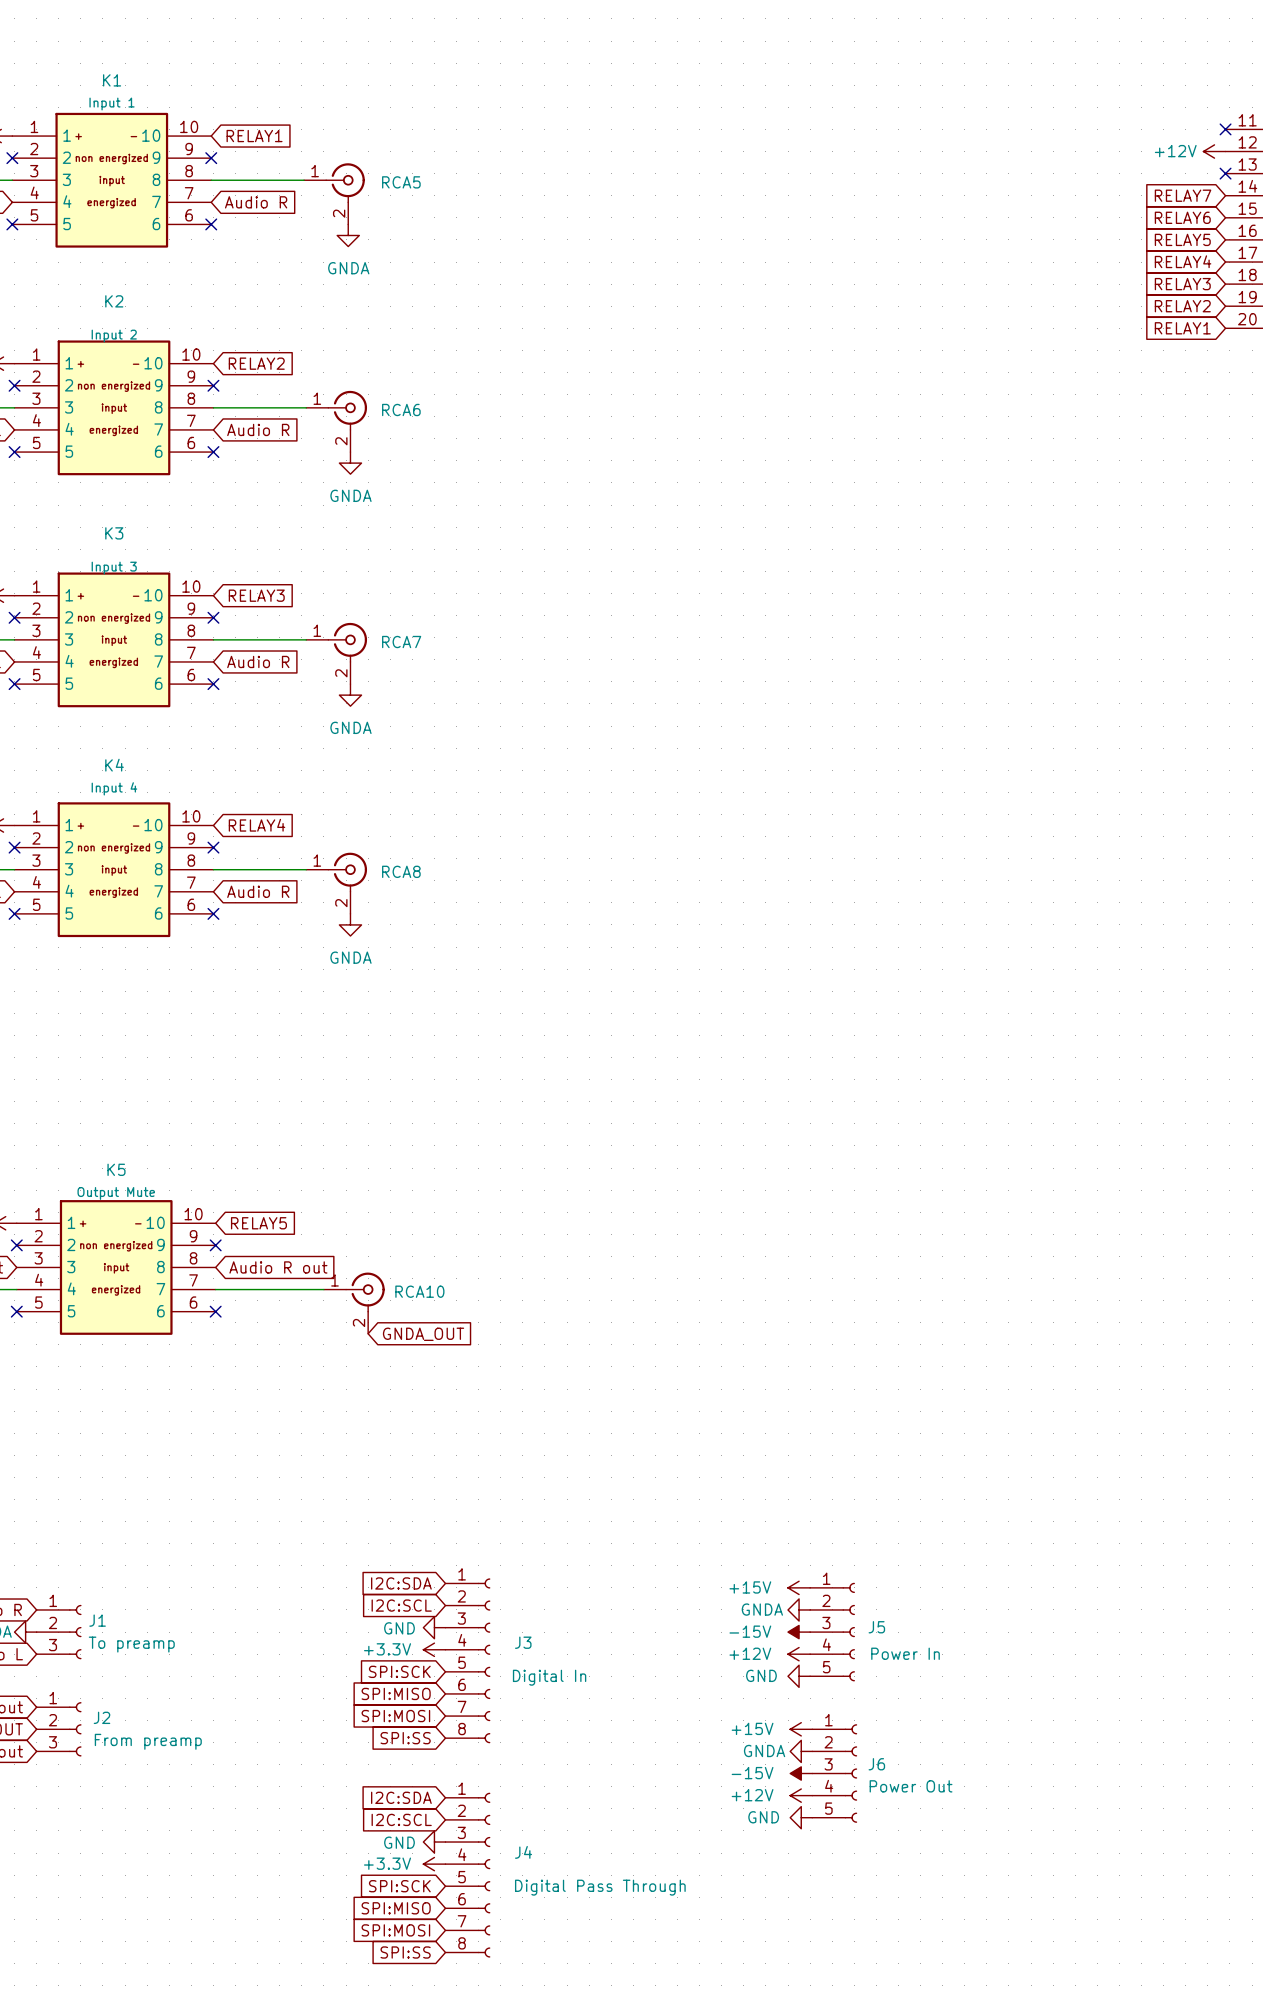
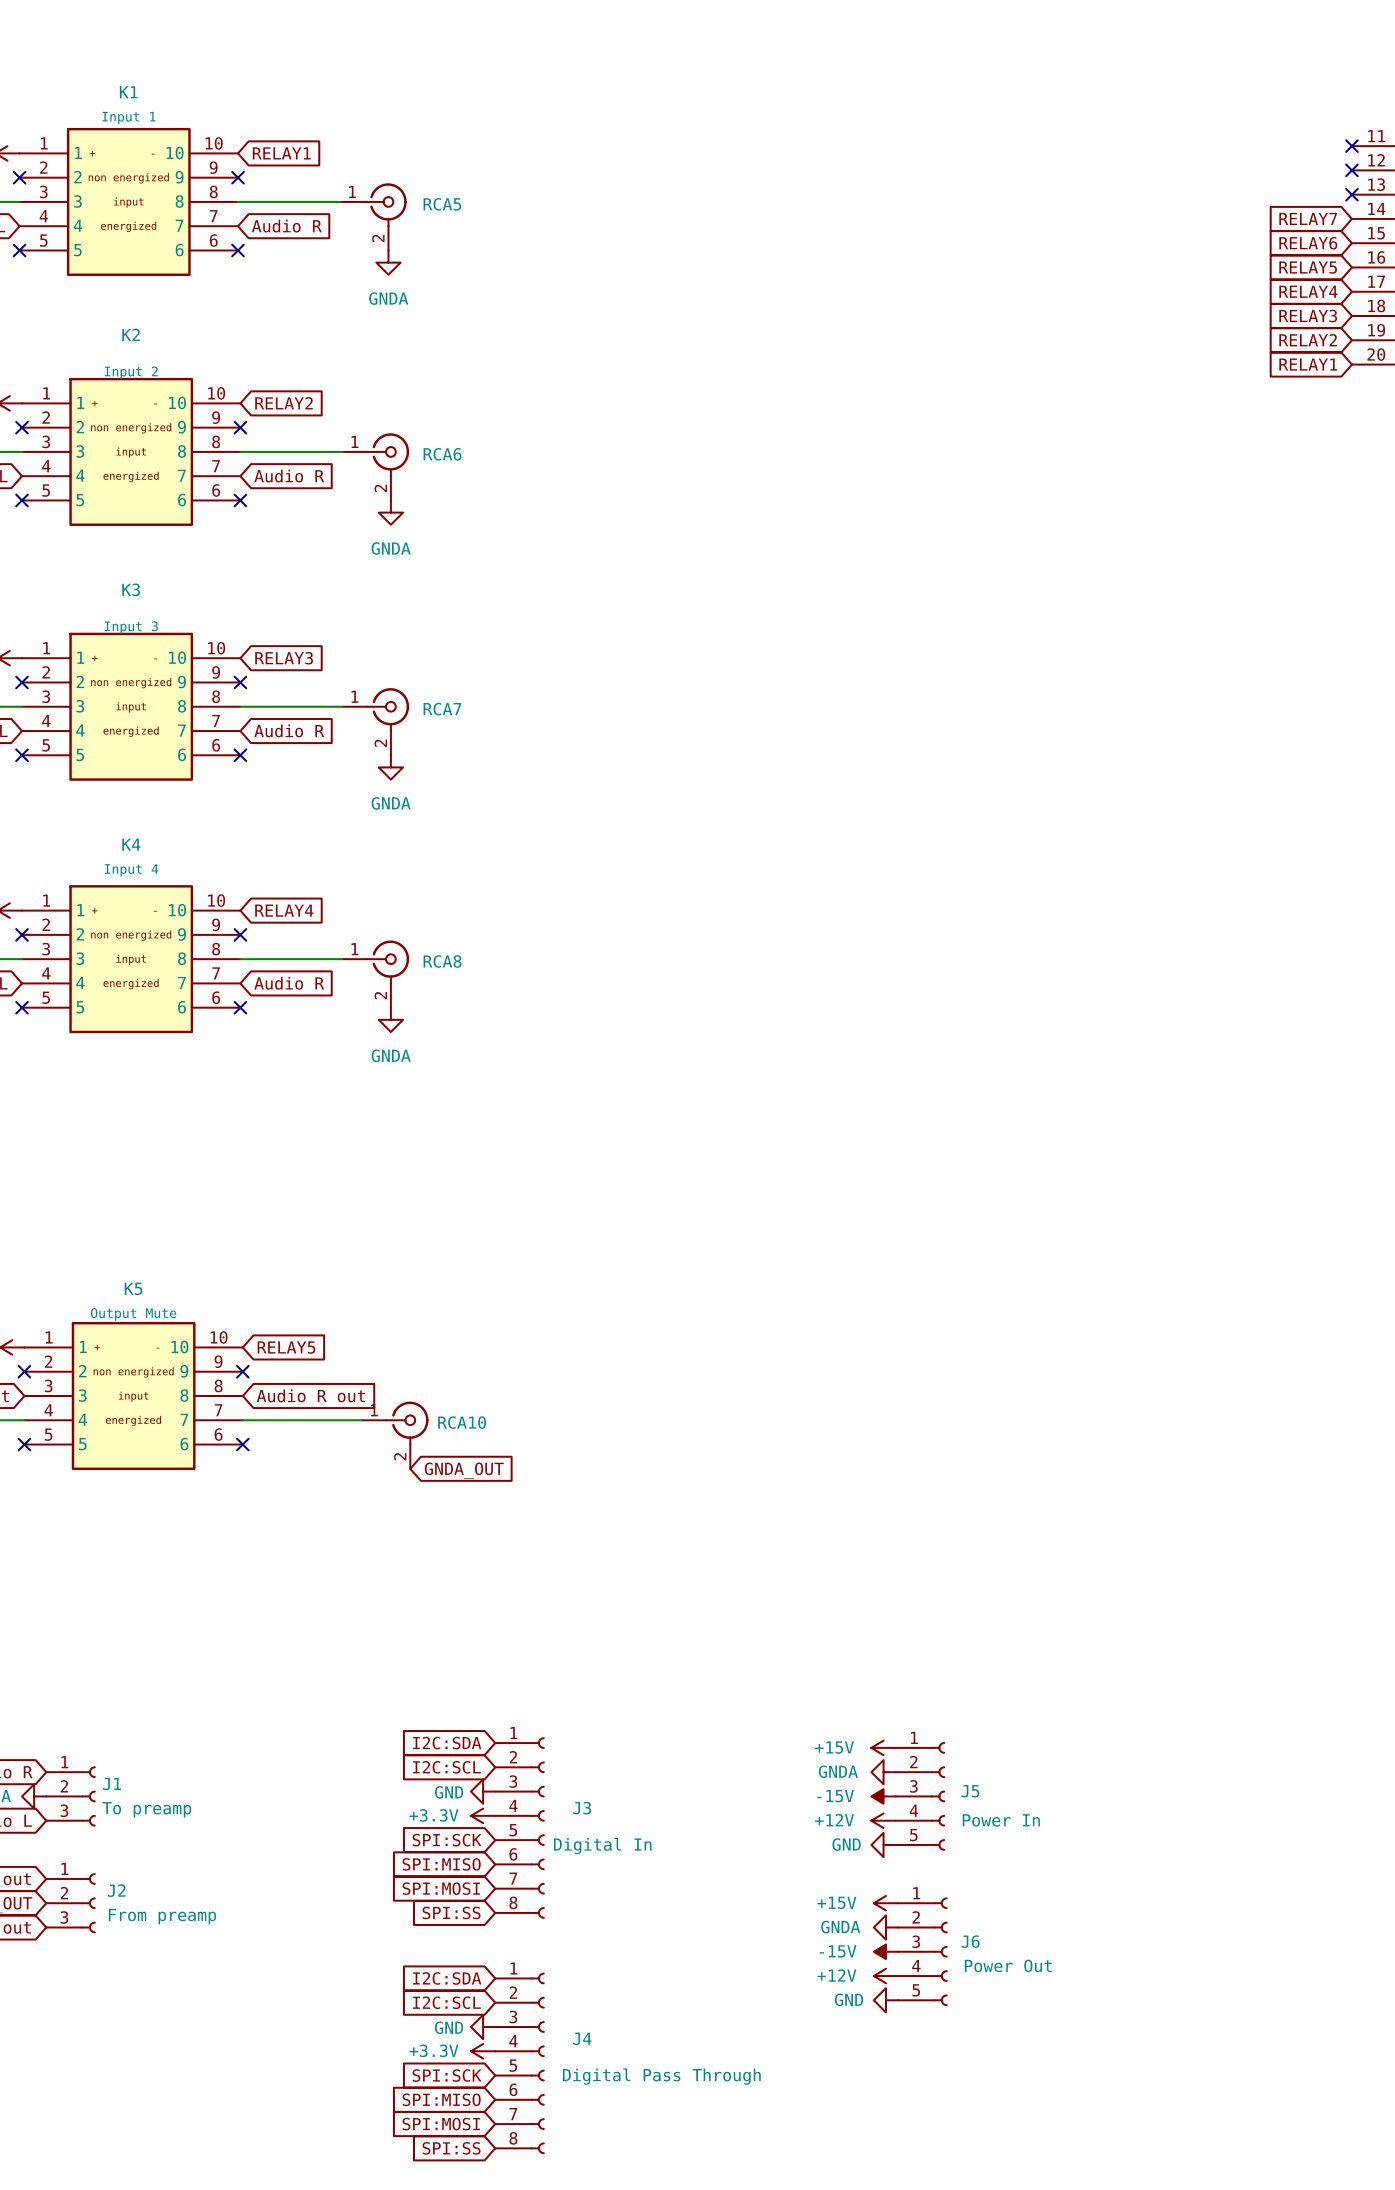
power symbol: +12V (1214, 151) -> none
no-connect mark: none -> (1351, 170)

